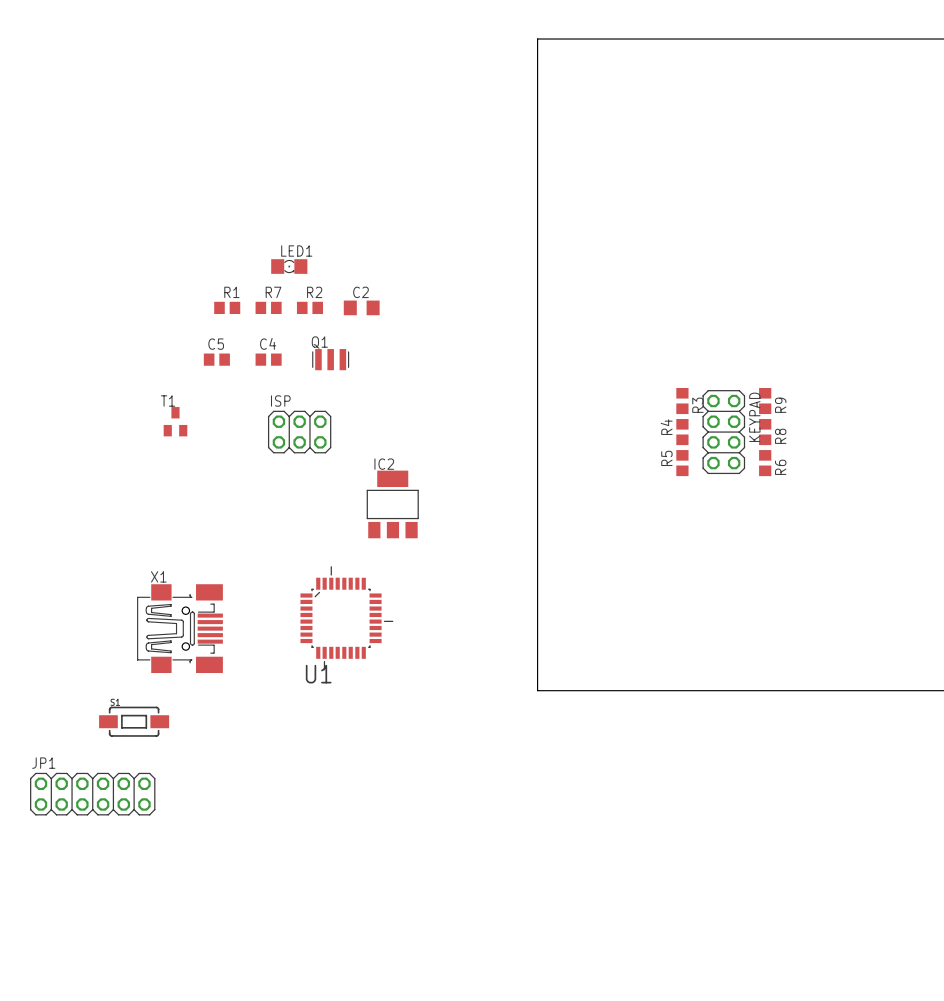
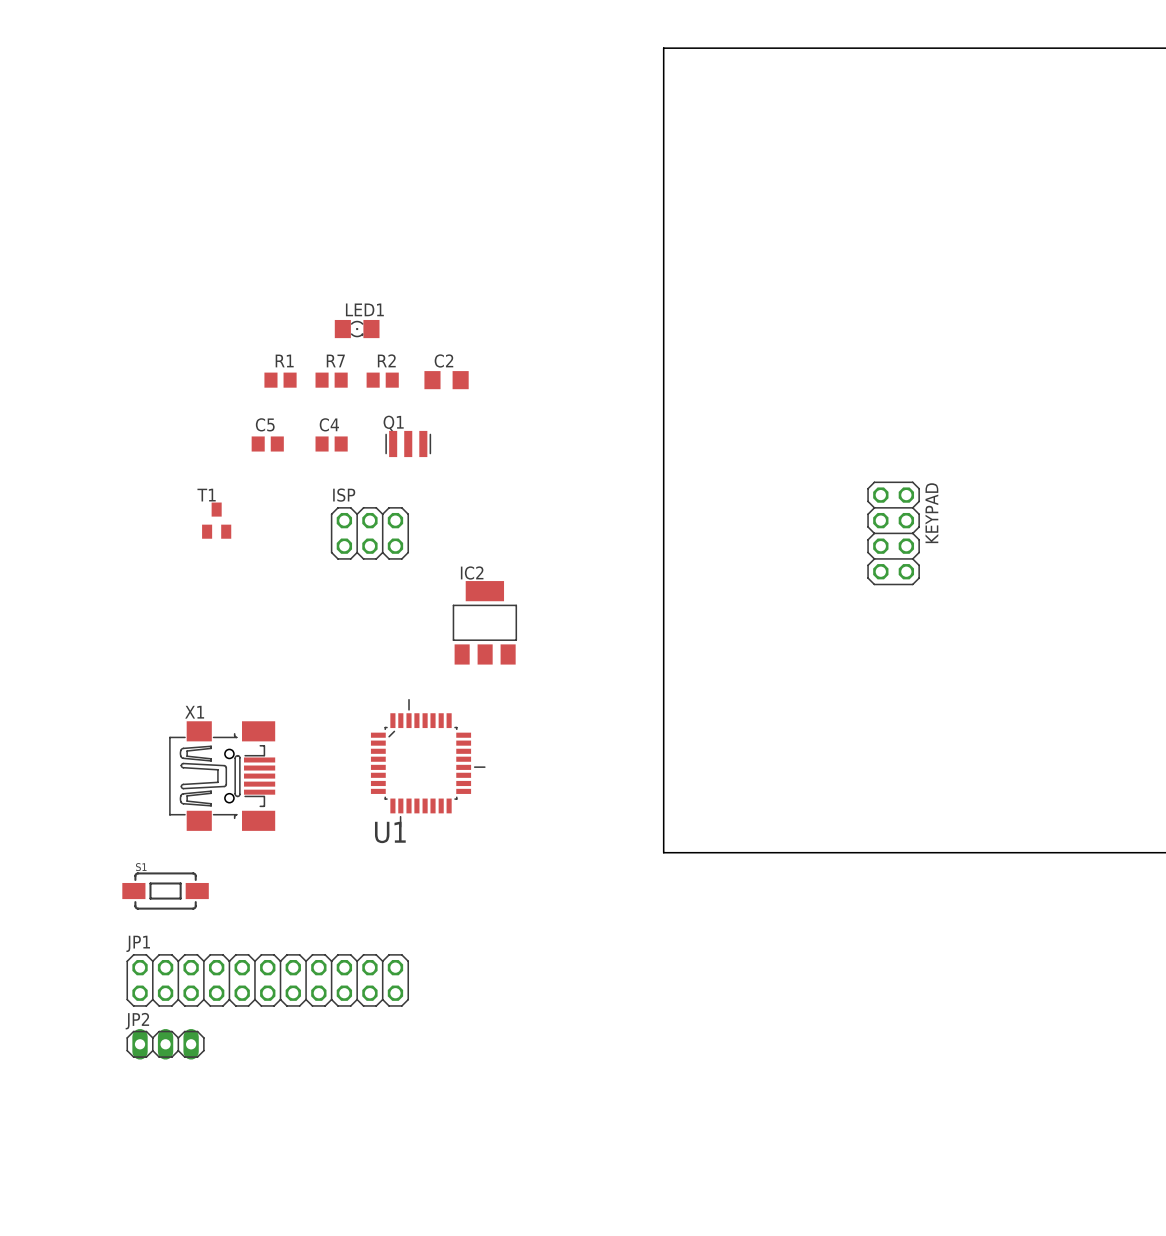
R3: (682, 401) -> none
R9: (765, 401) -> none
R4: (682, 432) -> none
R8: (765, 432) -> none
R5: (682, 463) -> none
R6: (765, 463) -> none
JP1 name position: JP1 (43, 763) -> JP1 (138, 943)
JP1 footprint: [30, 772, 156, 816] -> [126, 954, 410, 1007]
JP2: none -> (165, 1044)

